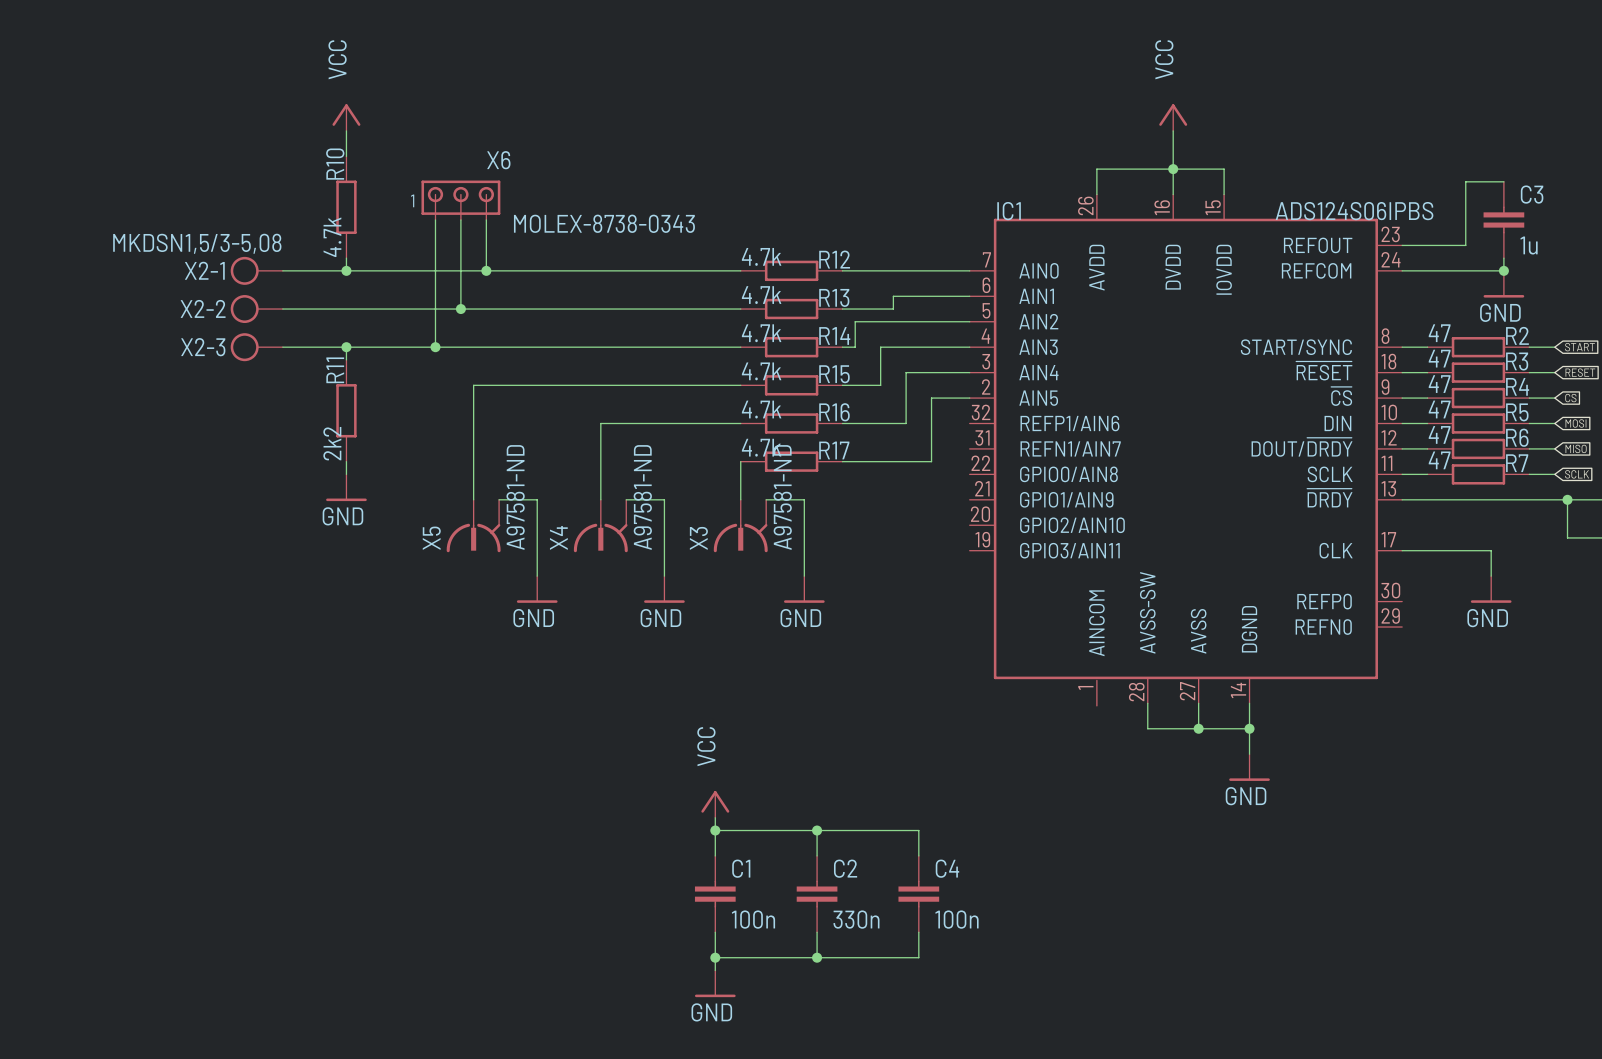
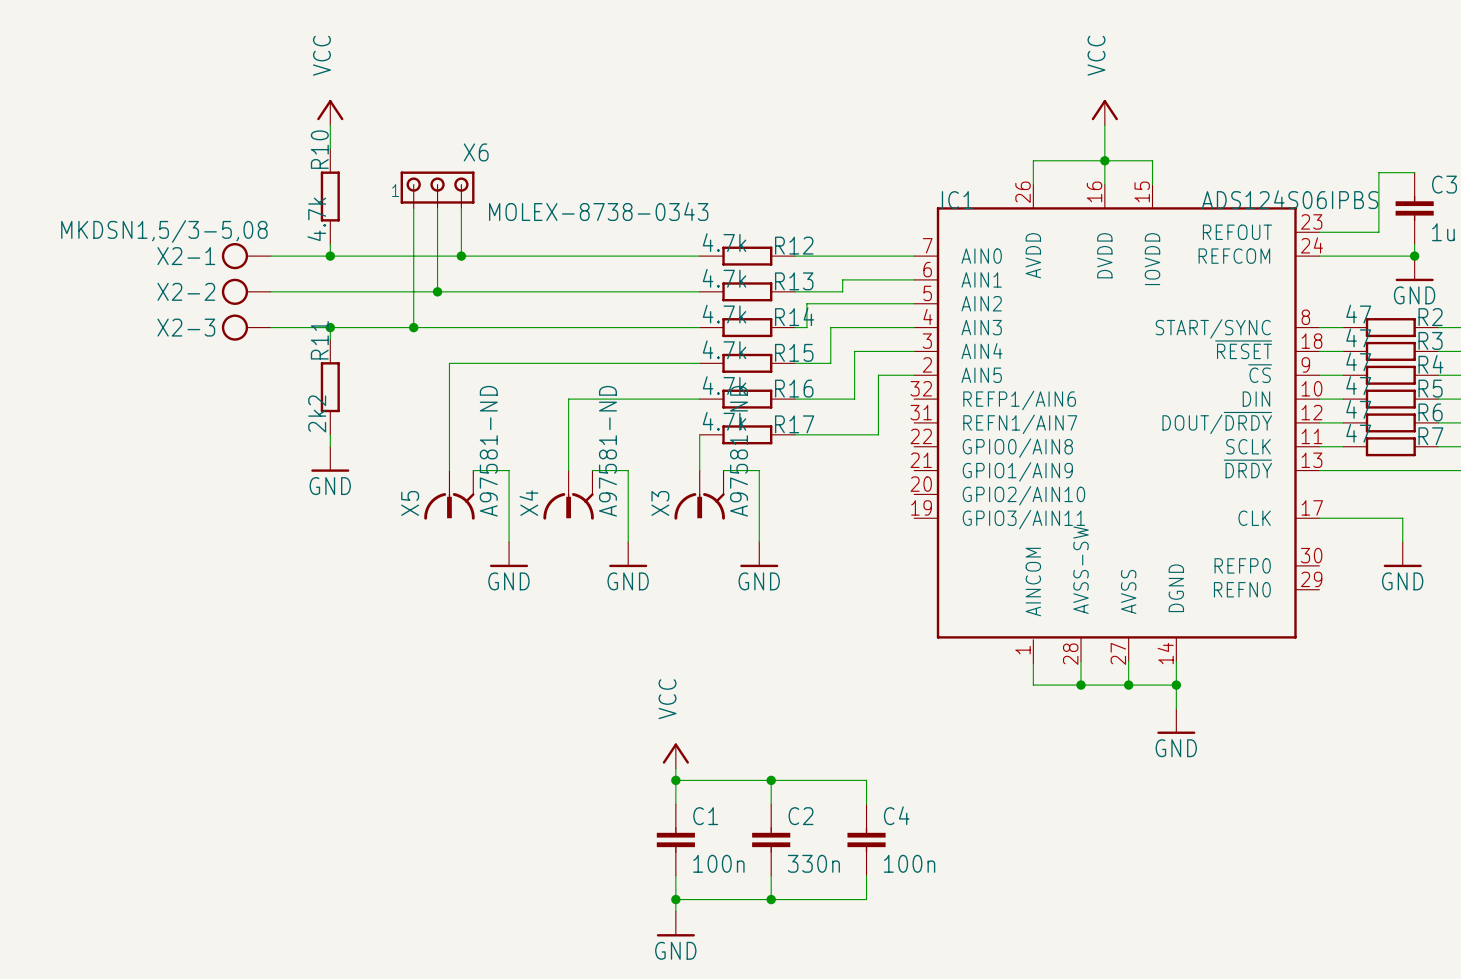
wire: none -> (1033, 663) (1033, 685) (1081, 685)
junction: none -> (1081, 685)

